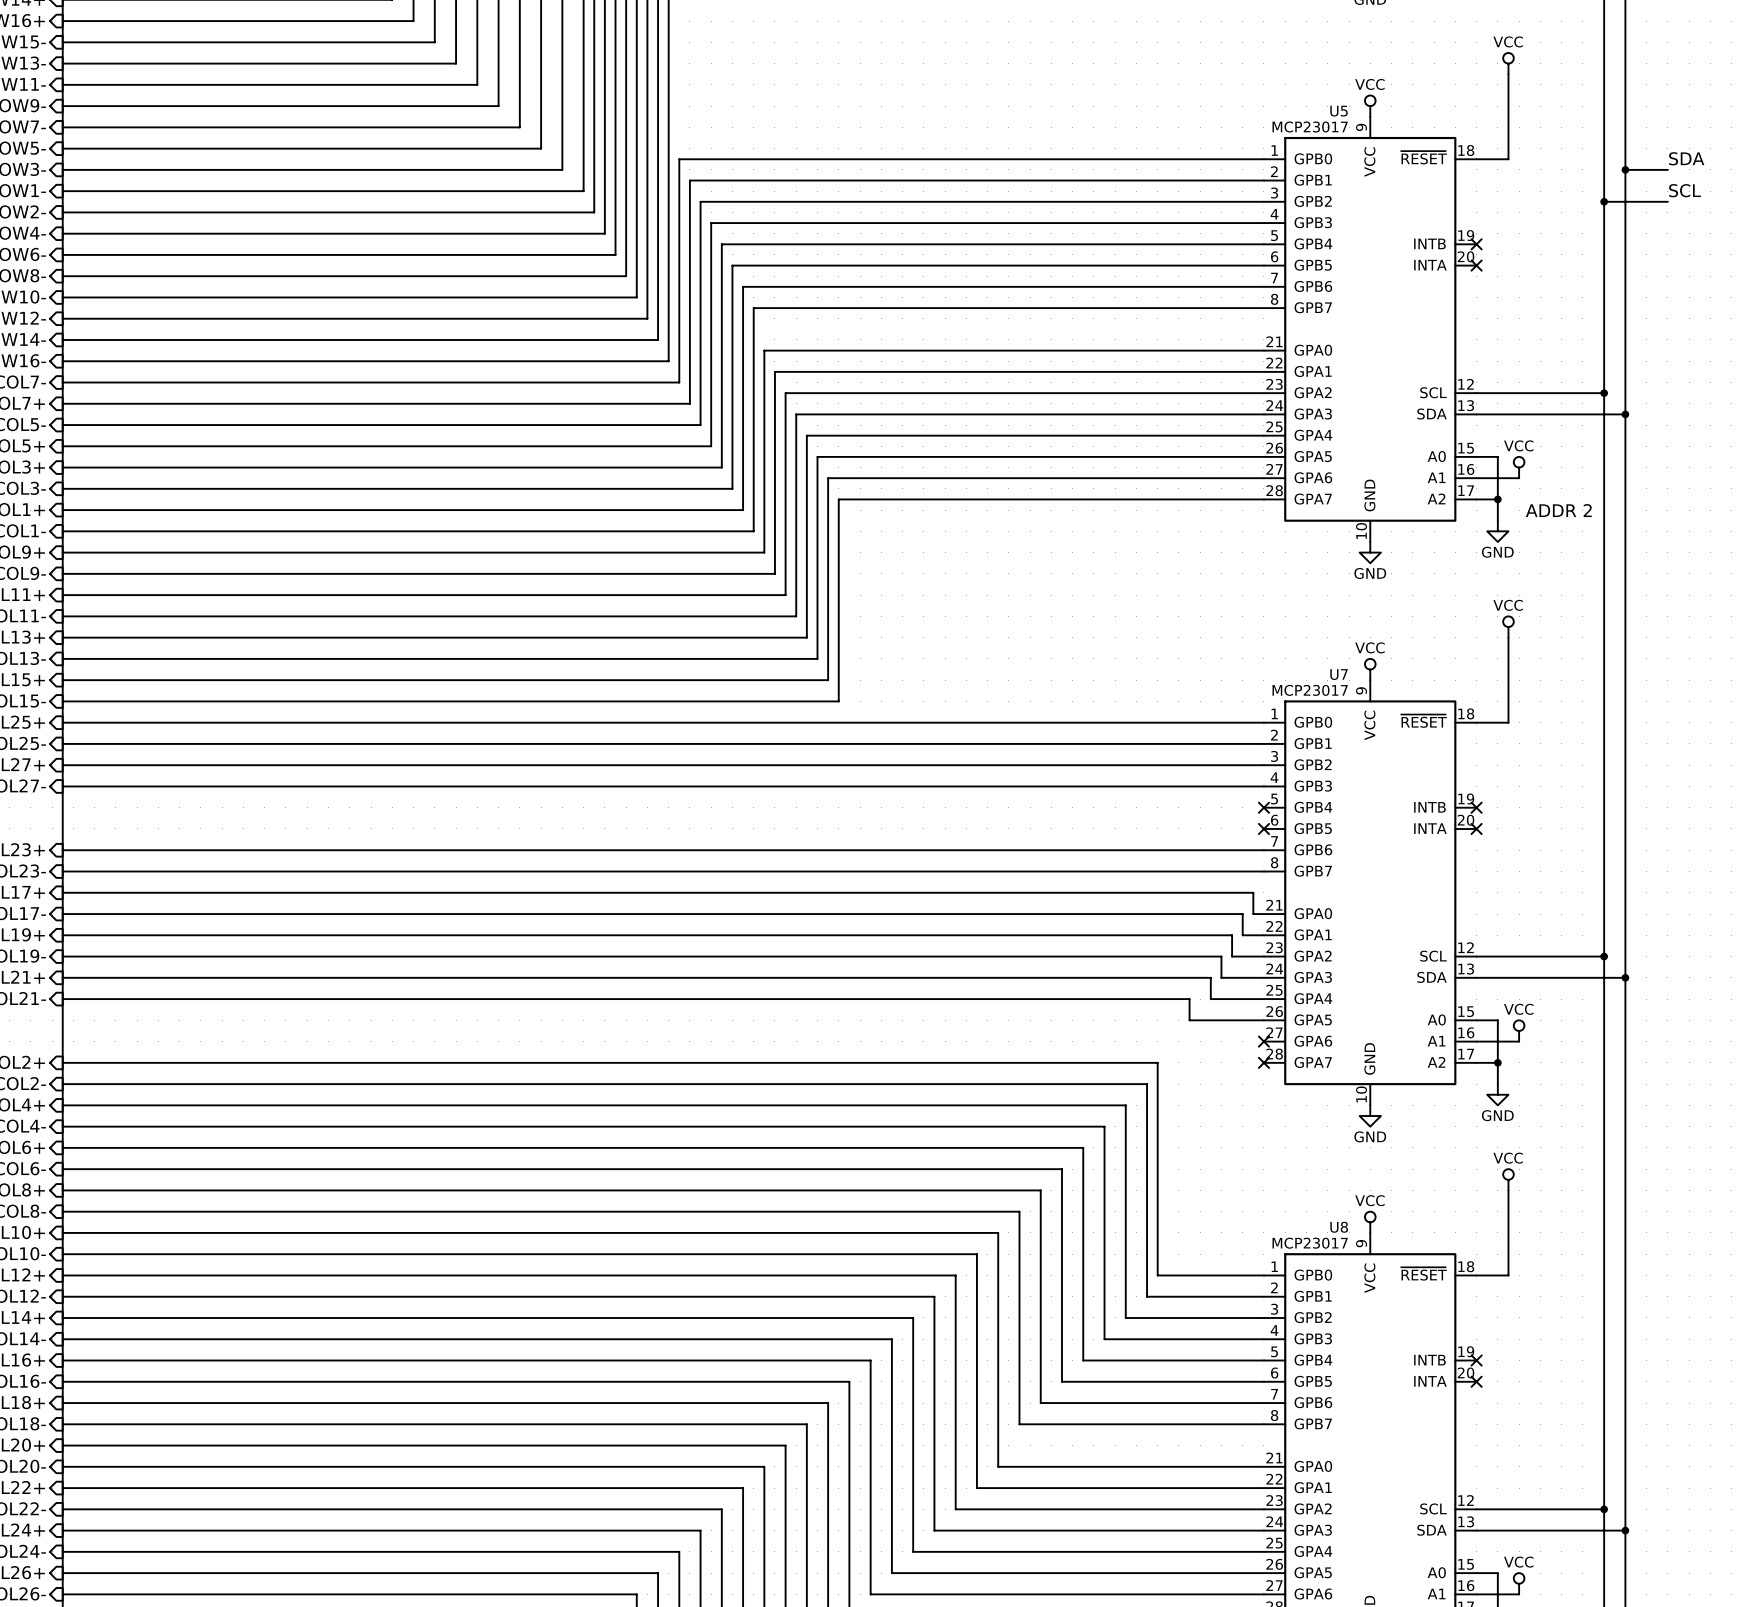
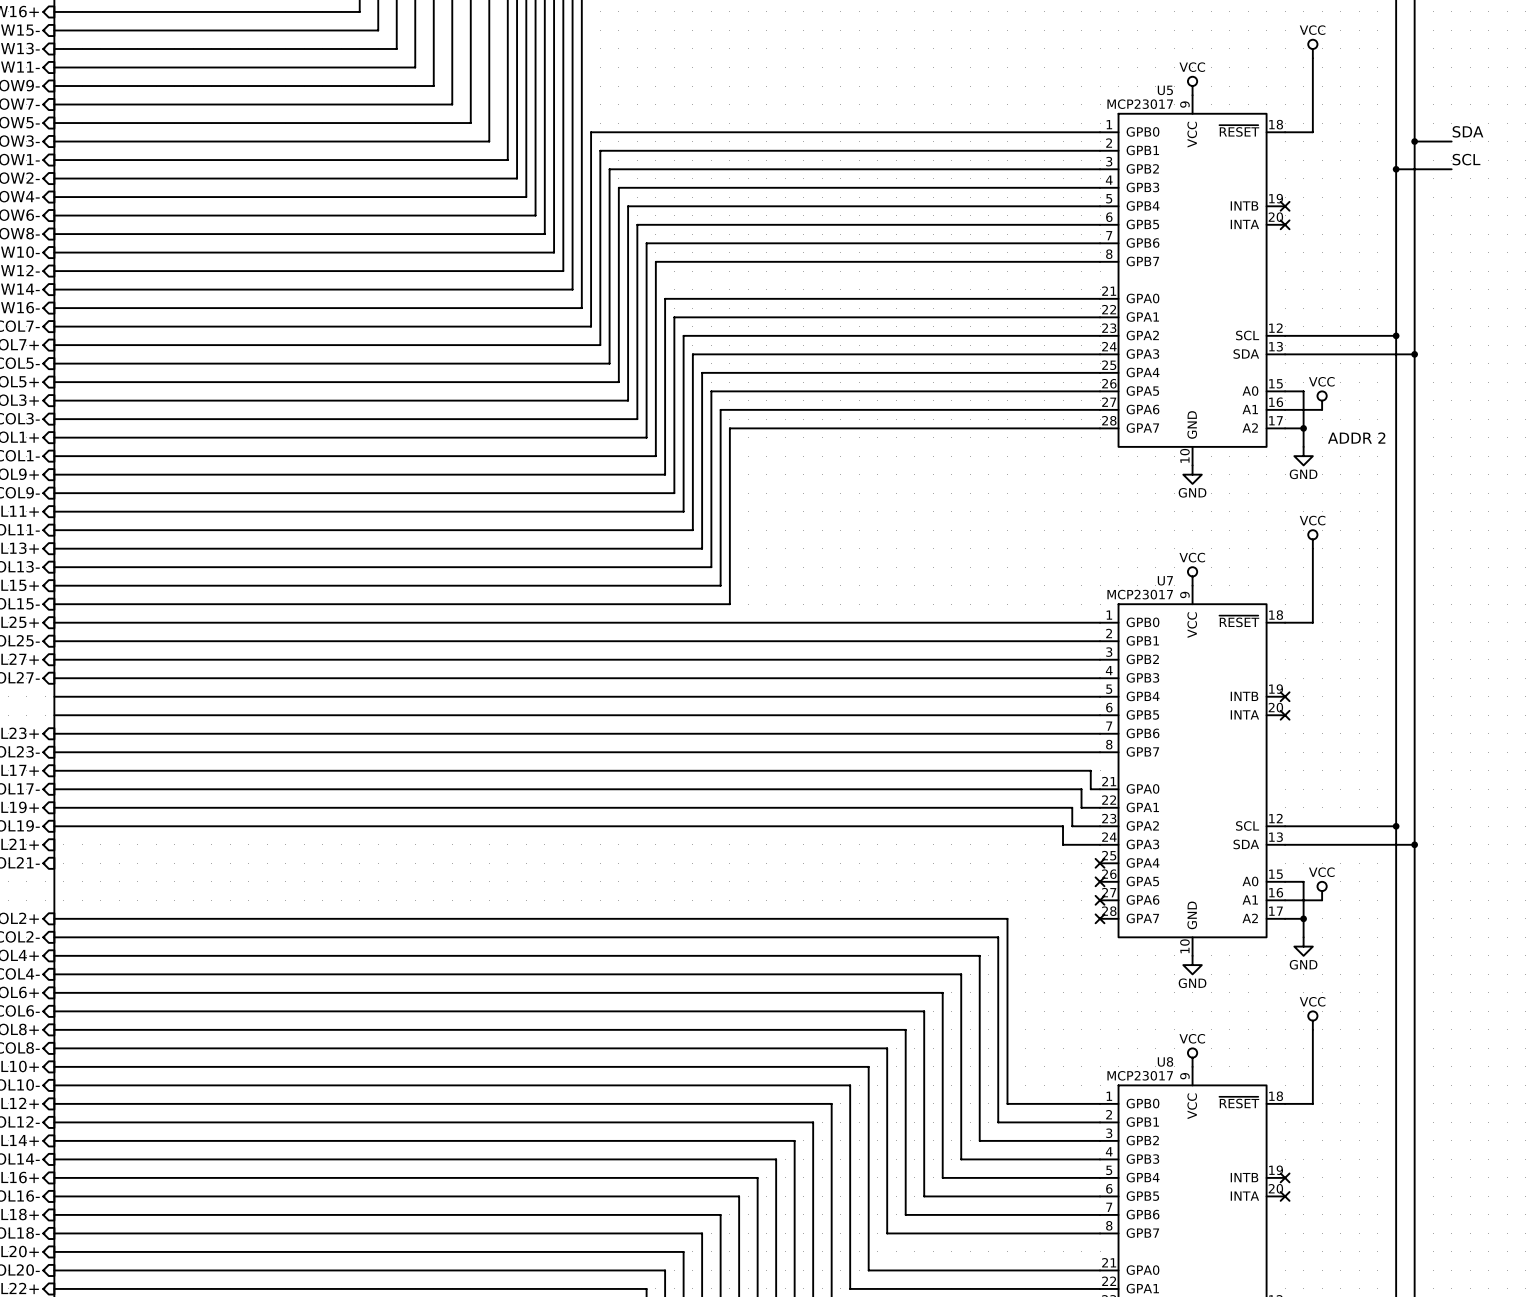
wire: none -> (54, 696) (1100, 696)
no-connect mark: (1263, 807) -> none
wire: none -> (54, 715) (1100, 715)
no-connect mark: (1263, 828) -> none
wire: (62, 977) (1210, 977) (1210, 999) (1263, 999) -> none
wire: (62, 999) (1189, 999) (1189, 1020) (1263, 1020) -> none
no-connect mark: none -> (1100, 863)
no-connect mark: none -> (1100, 881)

